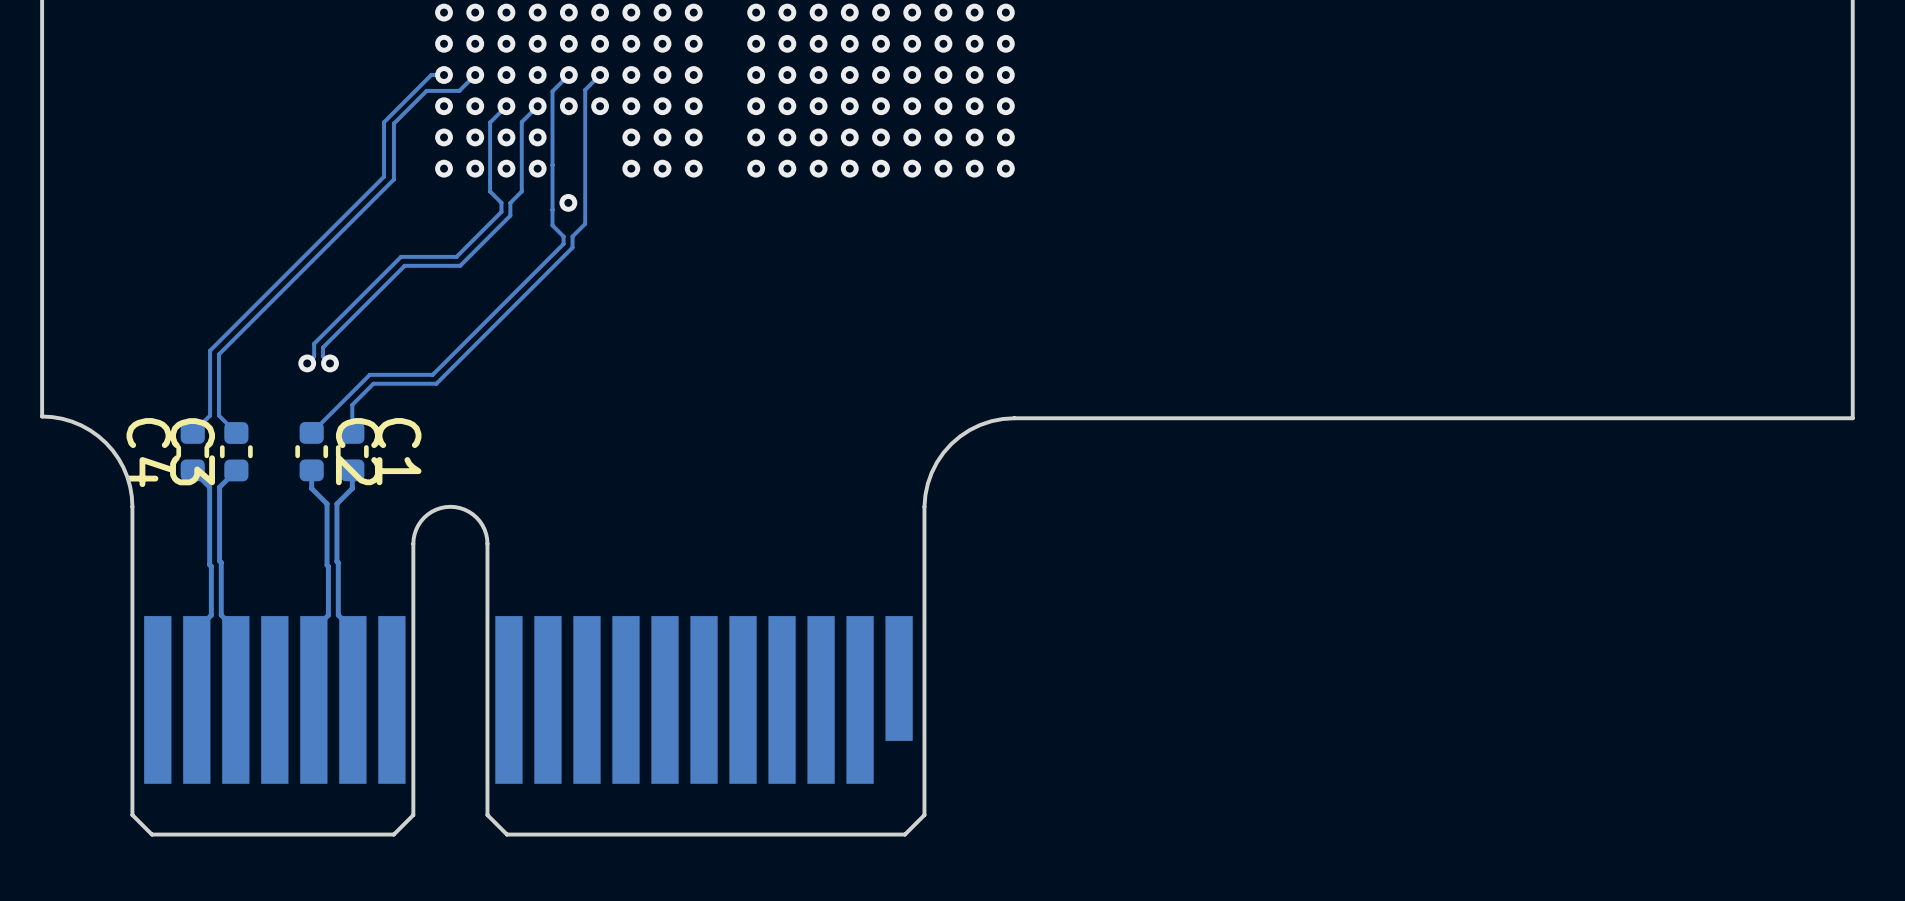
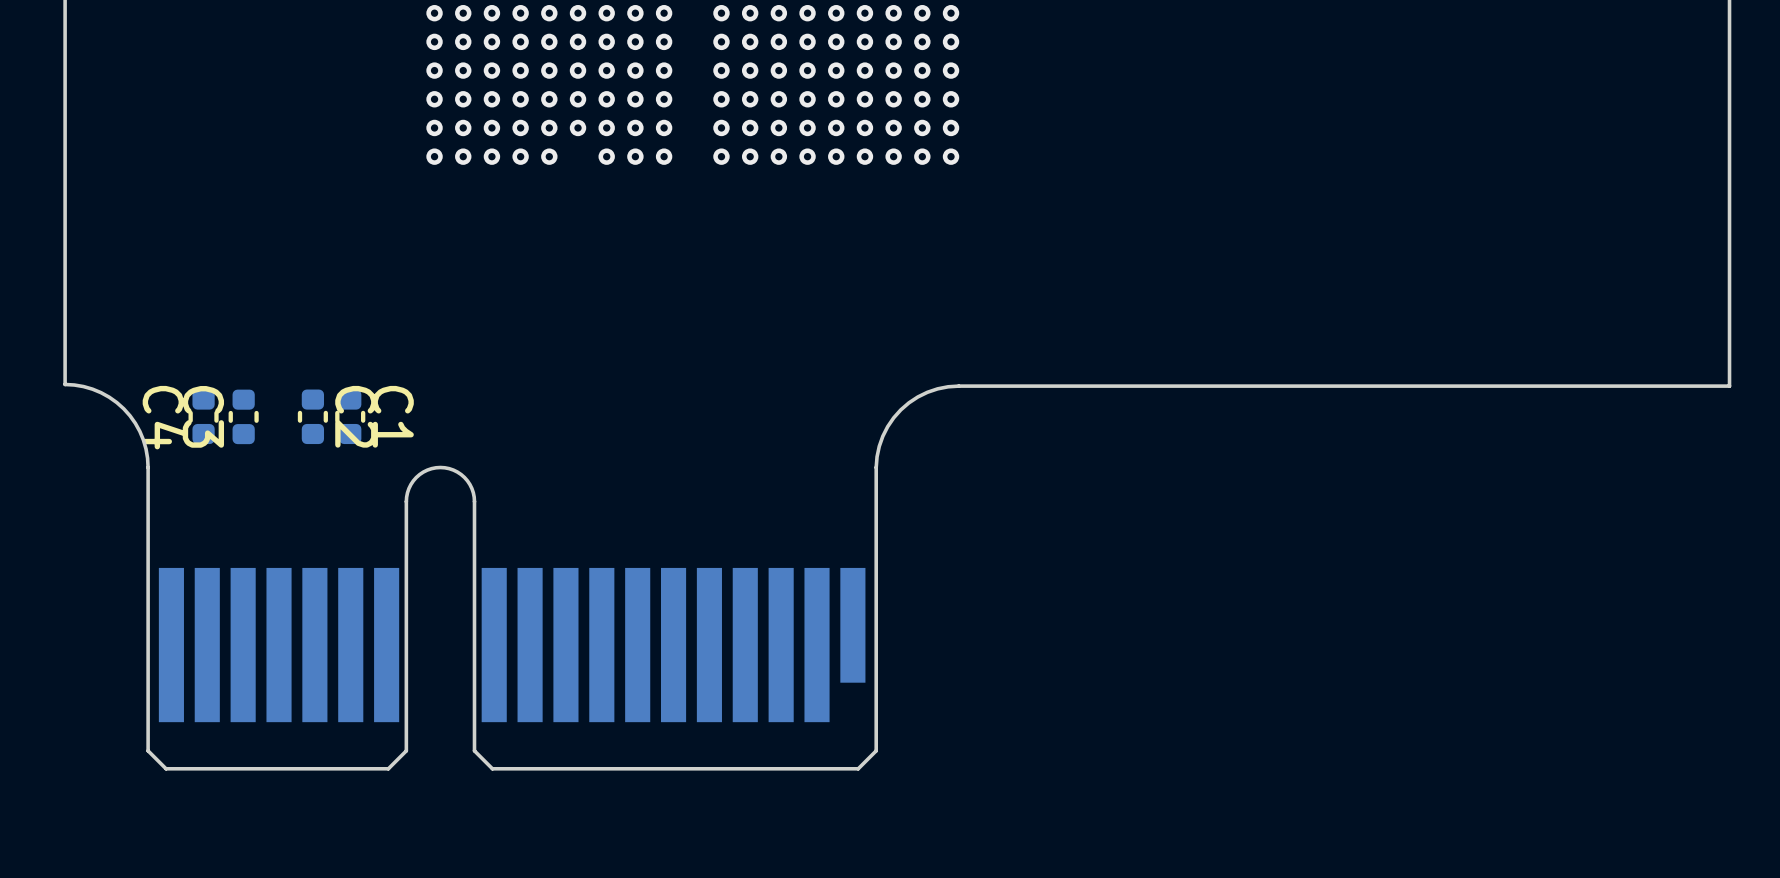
track: (444, 75) (431, 75) (384, 122) (384, 176) (210, 350) (210, 415) (192, 432) -> none
track: (475, 75) (459, 90) (426, 90) (393, 123) (393, 179) (218, 354) (218, 415) (236, 433) -> none
track: (568, 75) (552, 91) (552, 225) (563, 236) (563, 243) (432, 374) (369, 374) (311, 432) -> none
track: (600, 75) (585, 89) (585, 223) (572, 236) (572, 247) (436, 383) (373, 383) (352, 404) (352, 432) -> none
track: (506, 106) (490, 122) (490, 191) (501, 202) (501, 211) (456, 256) (401, 256) (314, 343) (314, 356) (307, 363) -> none
track: (537, 106) (521, 122) (521, 191) (510, 202) (510, 215) (460, 265) (404, 265) (323, 347) (323, 356) (330, 363) -> none
via: none -> (549, 127)
via: none -> (578, 127)
via: none -> (549, 156)
via: (568, 202) -> none
via: (307, 363) -> none
via: (330, 363) -> none
track: (192, 470) (209, 487) (209, 564) (211, 566) (211, 615) (196, 629) (196, 699) -> none
track: (236, 470) (219, 487) (221, 615) (235, 629) (235, 699) -> none
track: (311, 470) (311, 488) (327, 503) (328, 566) (328, 615) (313, 629) (313, 699) -> none
track: (352, 470) (352, 488) (336, 503) (336, 561) (338, 615) (352, 629) (352, 699) -> none

